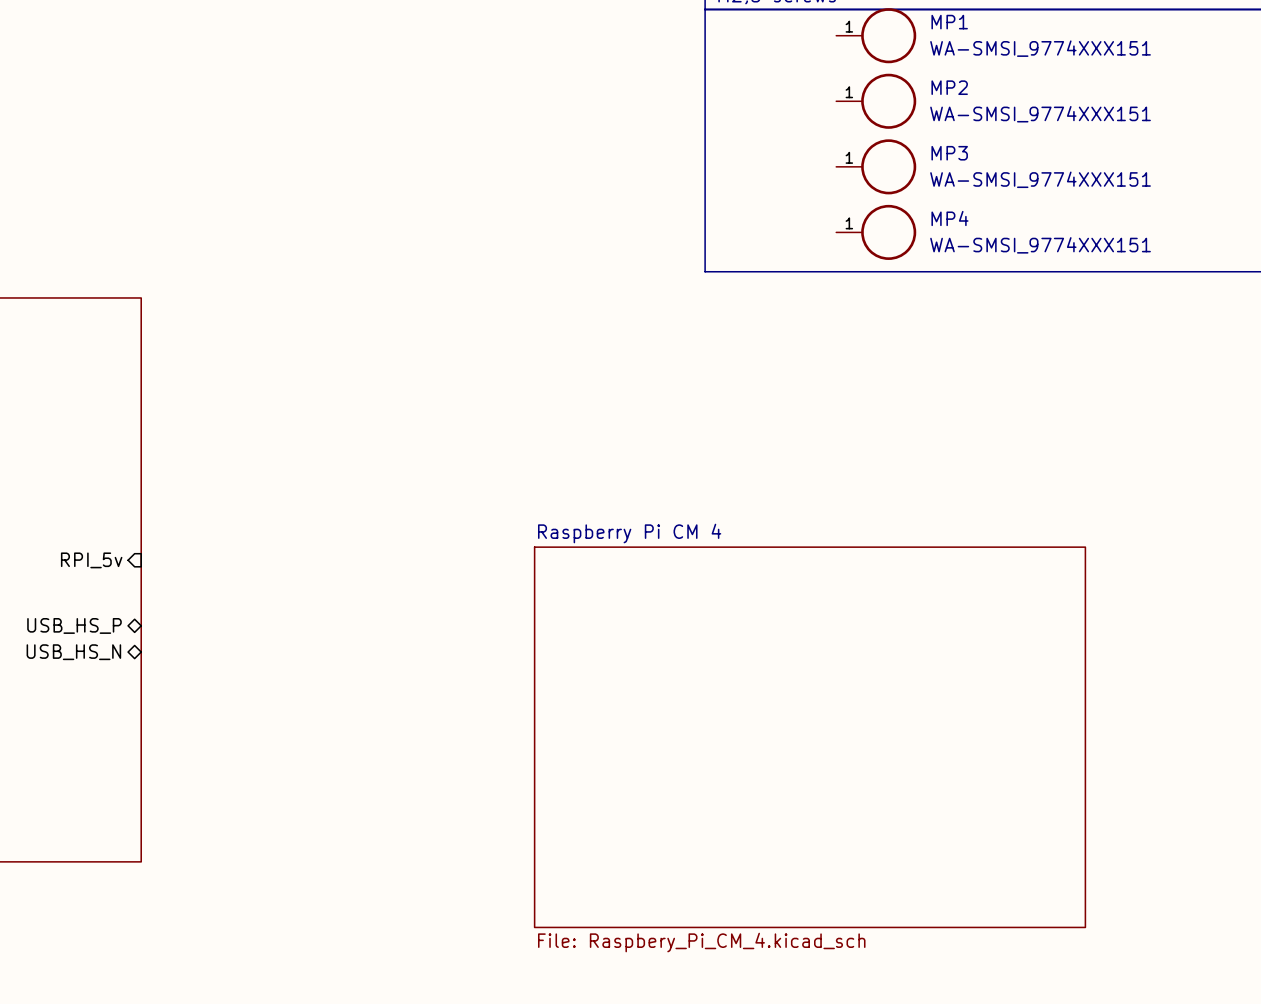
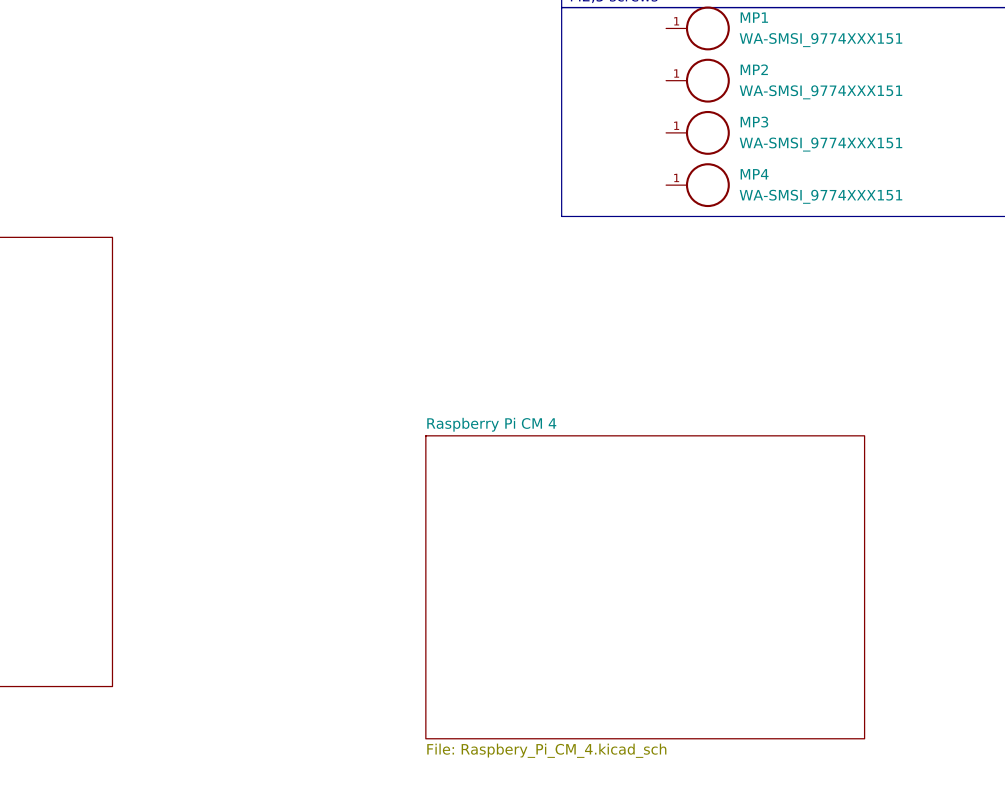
sheet pin: RPI_5v (91, 560) -> none
sheet pin: USB_HS_P (74, 625) -> none
sheet pin: USB_HS_N (73, 652) -> none

